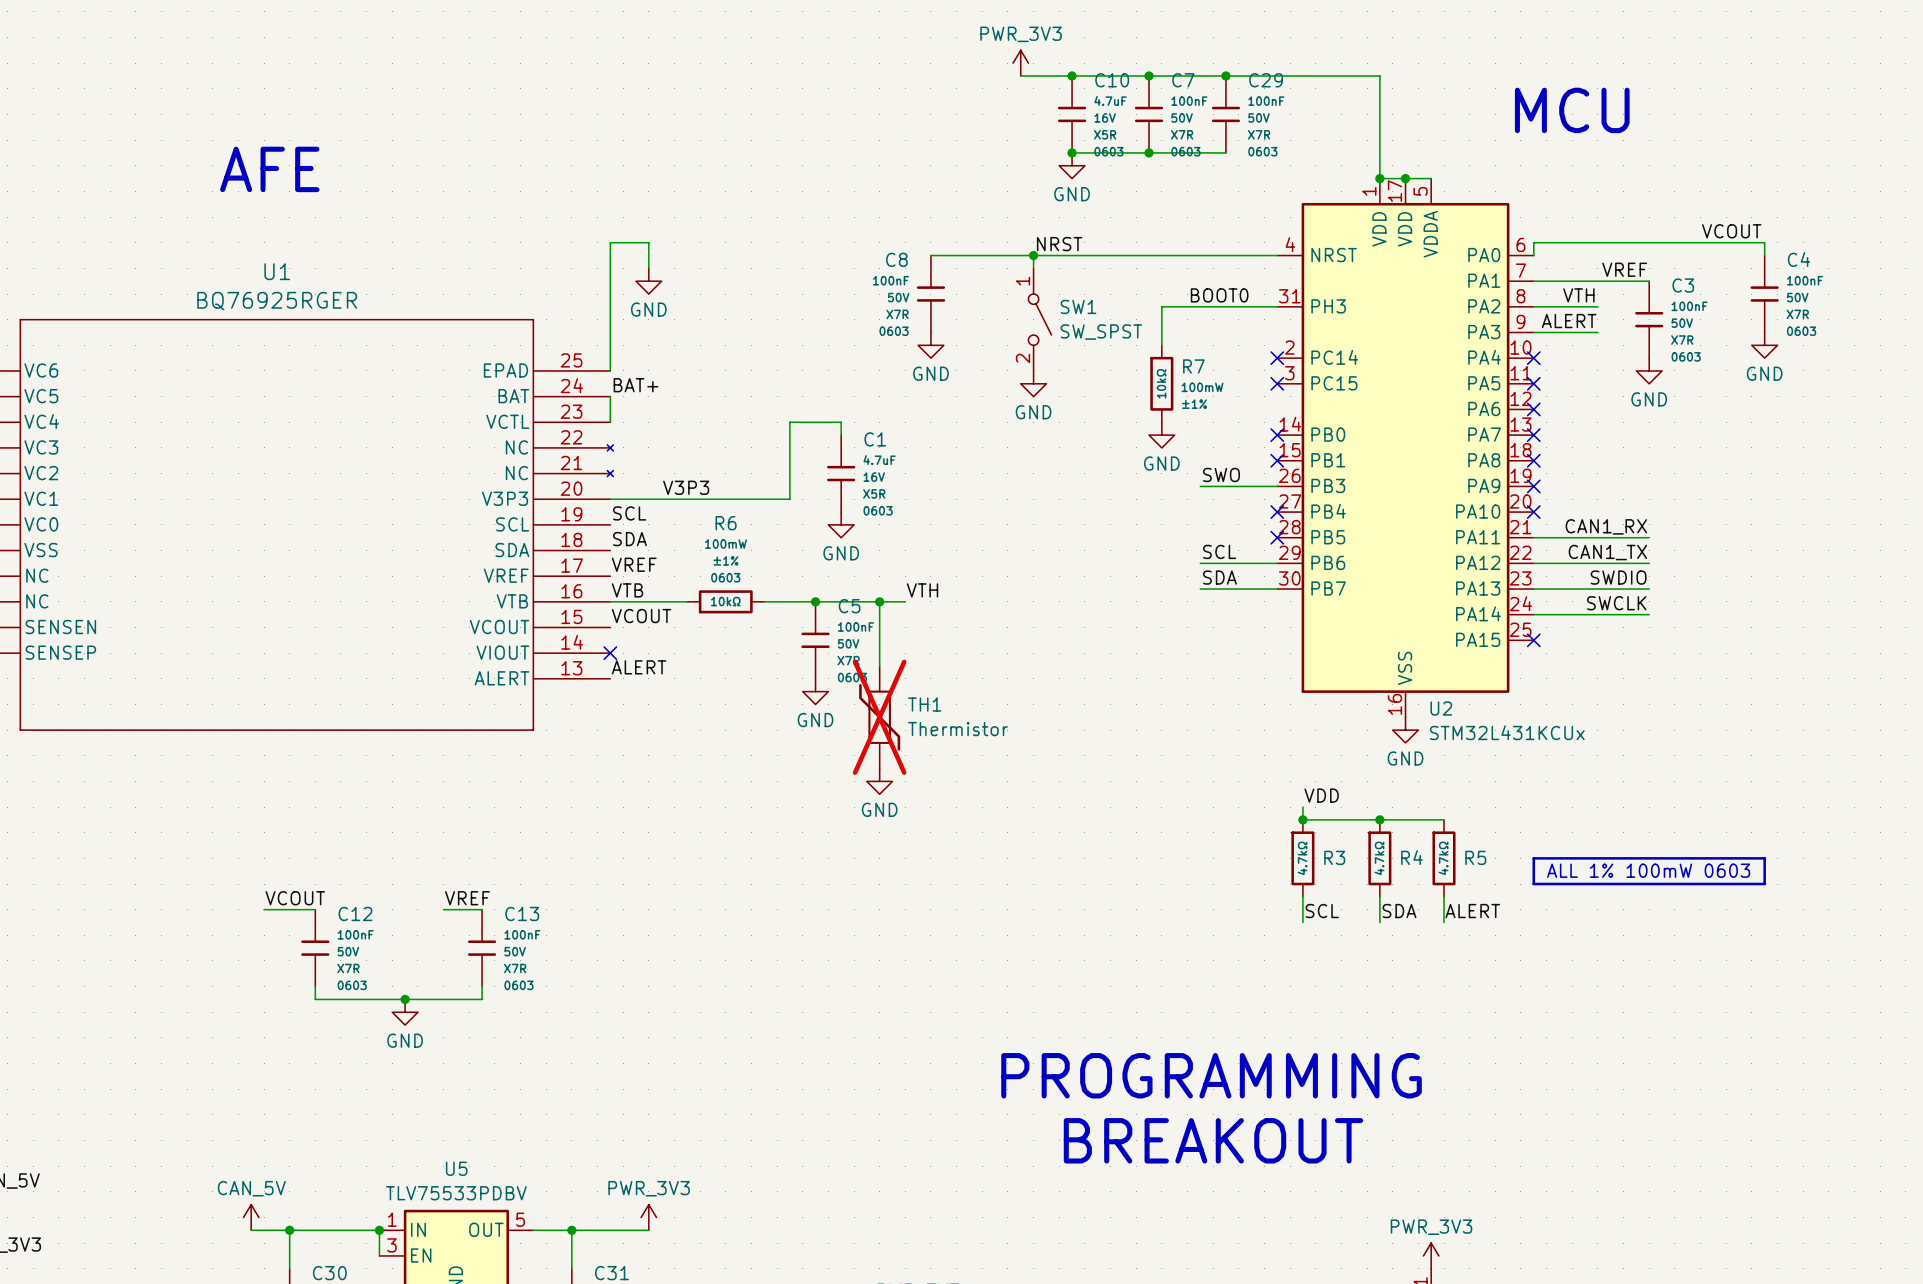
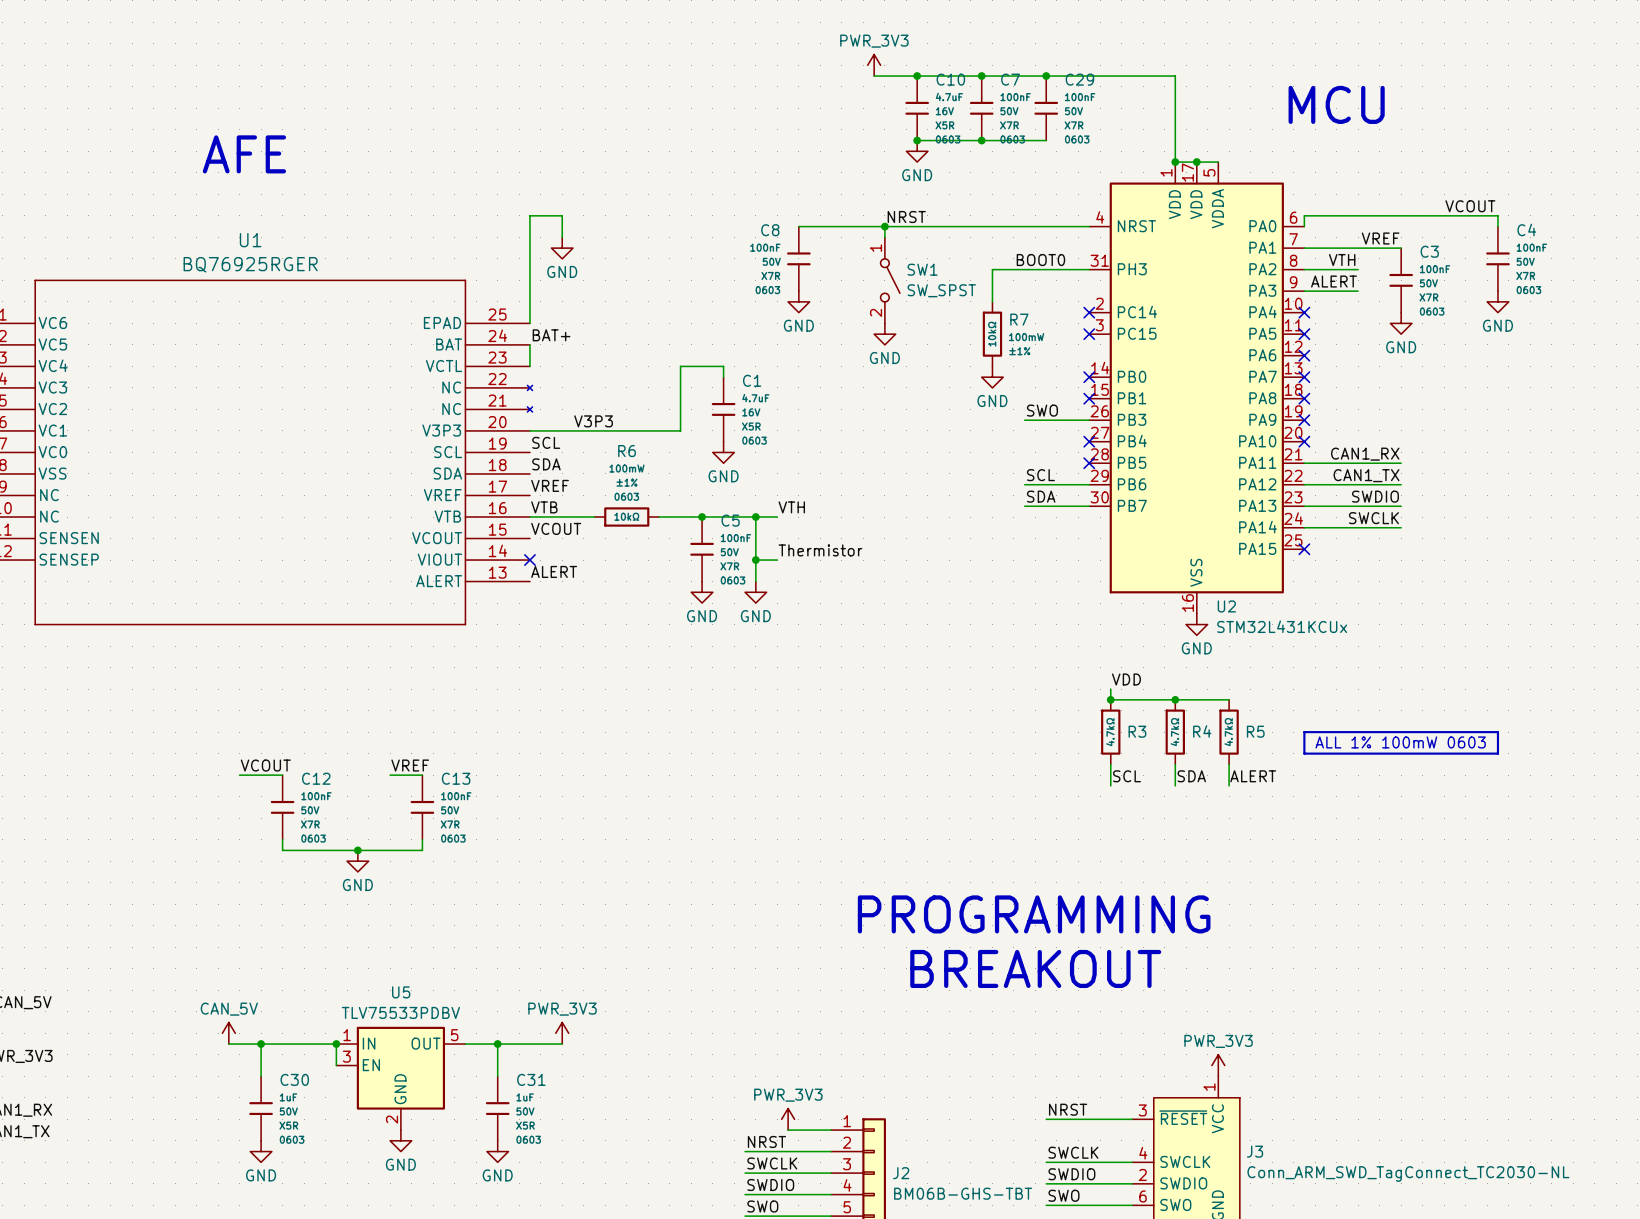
label: none -> Thermistor (820, 550)
wire: none -> (755, 560) (777, 560)
junction: none -> (755, 560)
TH1: Thermistor (879, 717) -> none
power symbol position: GND (879, 781) -> GND (755, 592)

